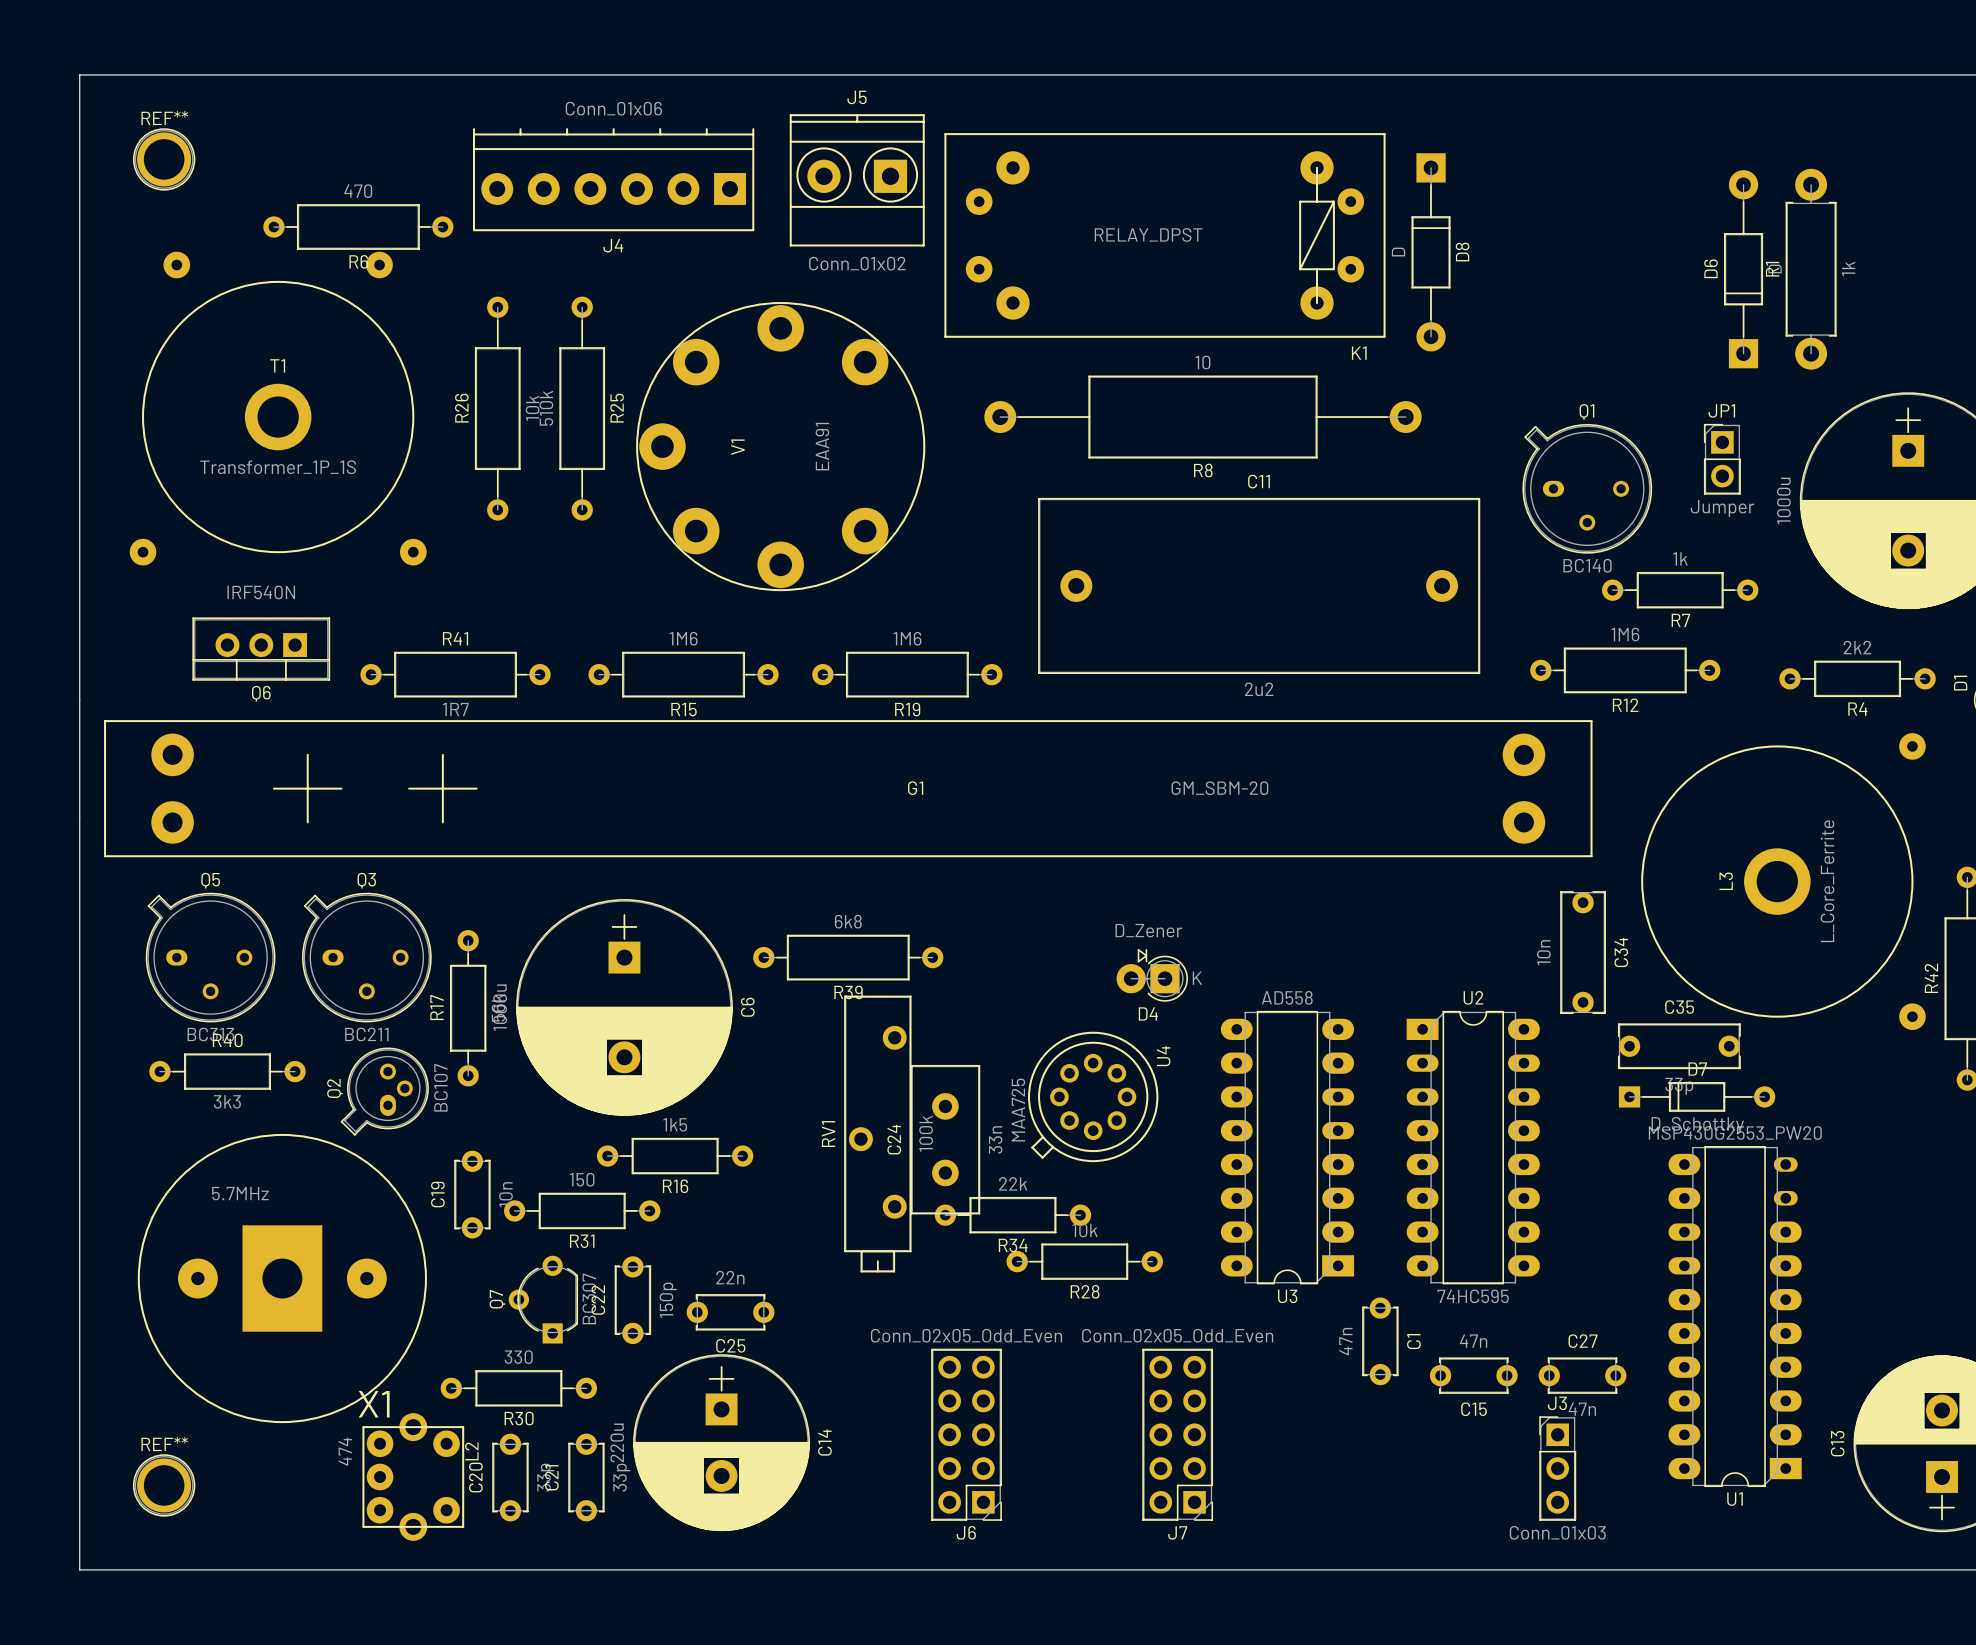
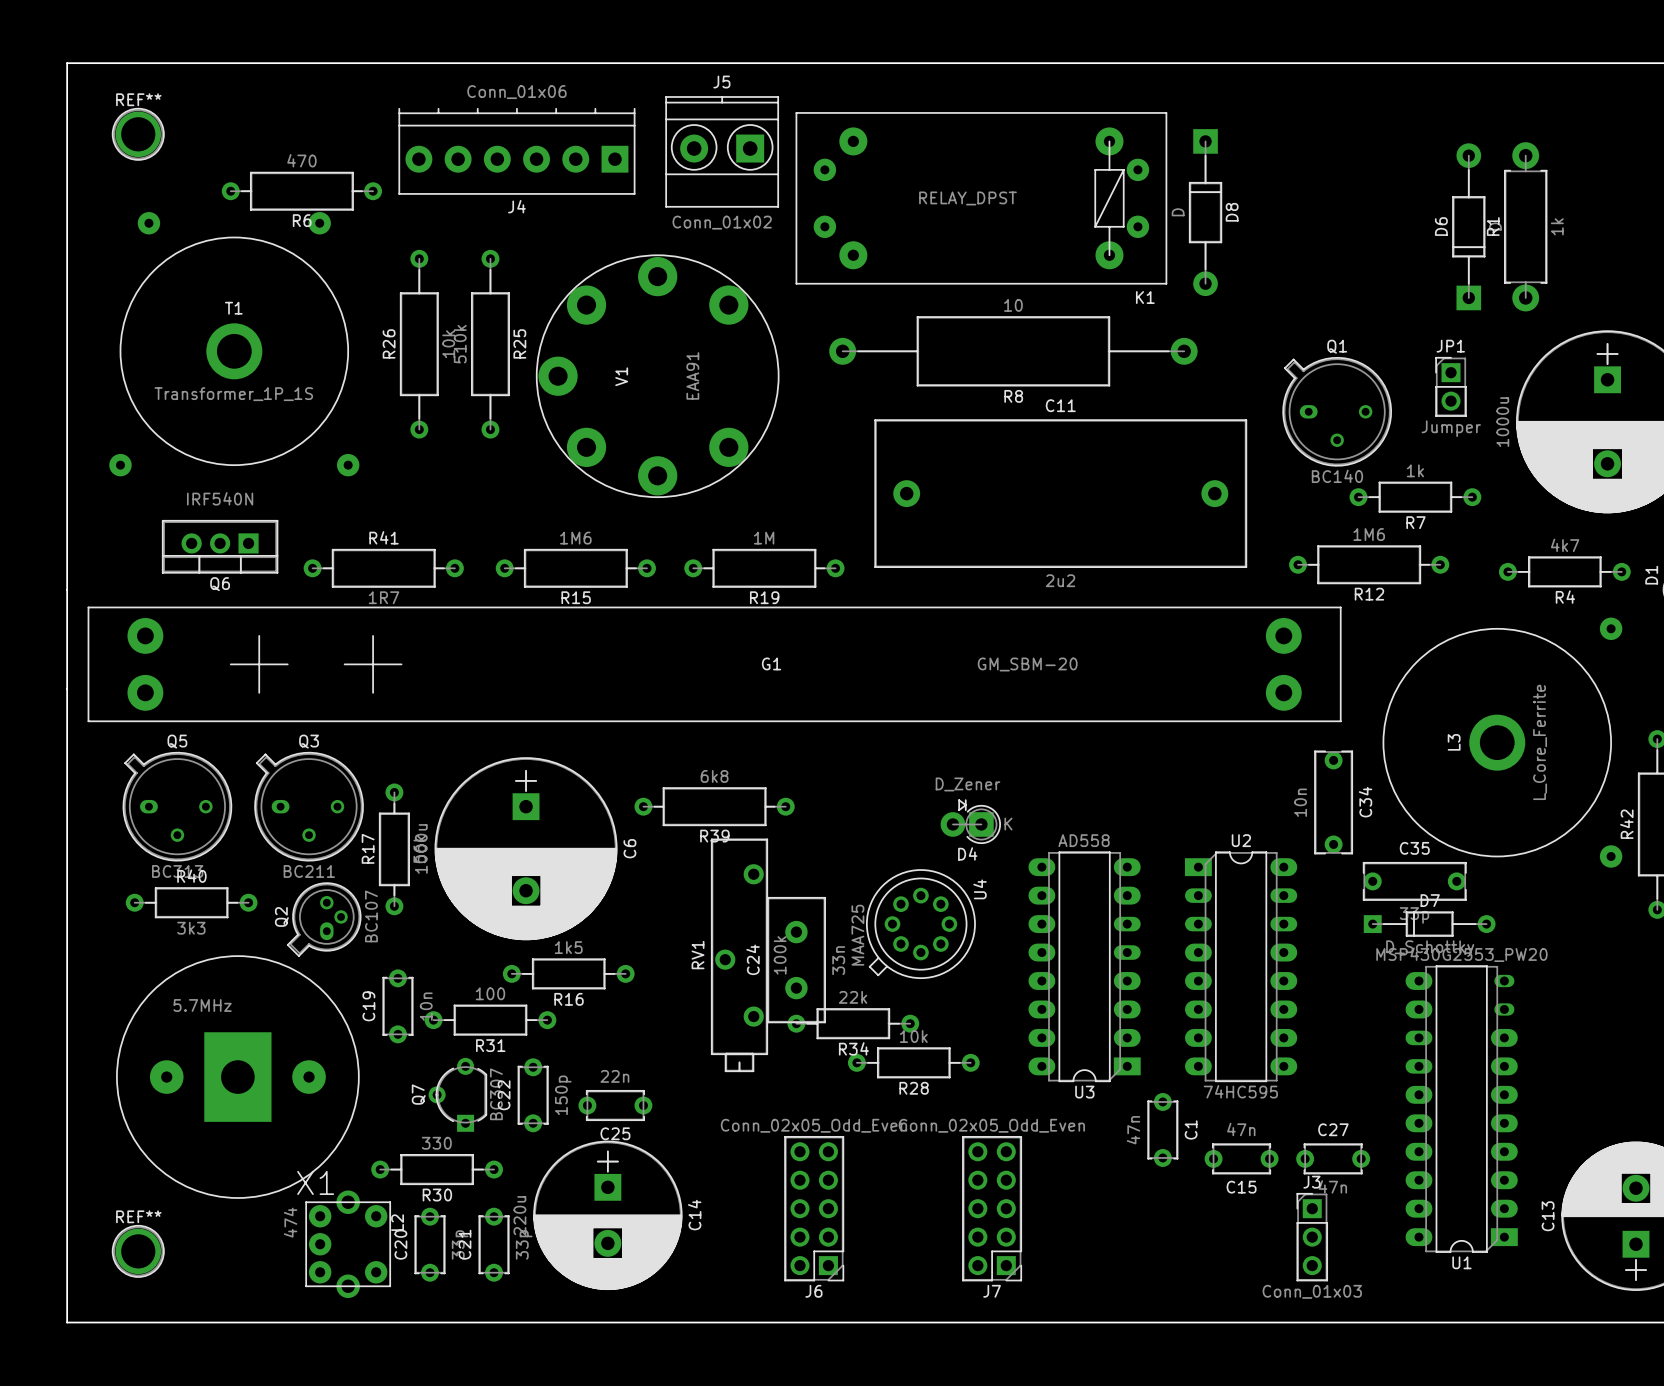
R19 value: 1M6 (907, 638) -> 1M (764, 538)
R4 value: 2k2 (1857, 647) -> 4k7 (1565, 545)
R31 value: 150 (582, 1179) -> 100 (490, 993)

